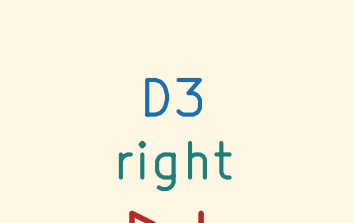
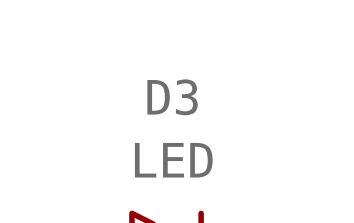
D3 value: right (175, 165) -> LED (173, 160)

